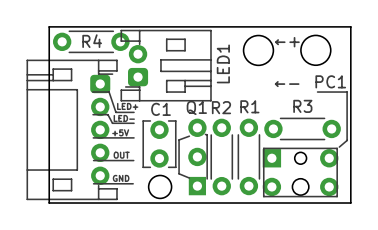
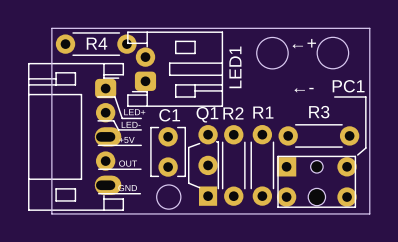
part footprint: [26, 59, 118, 201] -> [28, 62, 125, 211]

